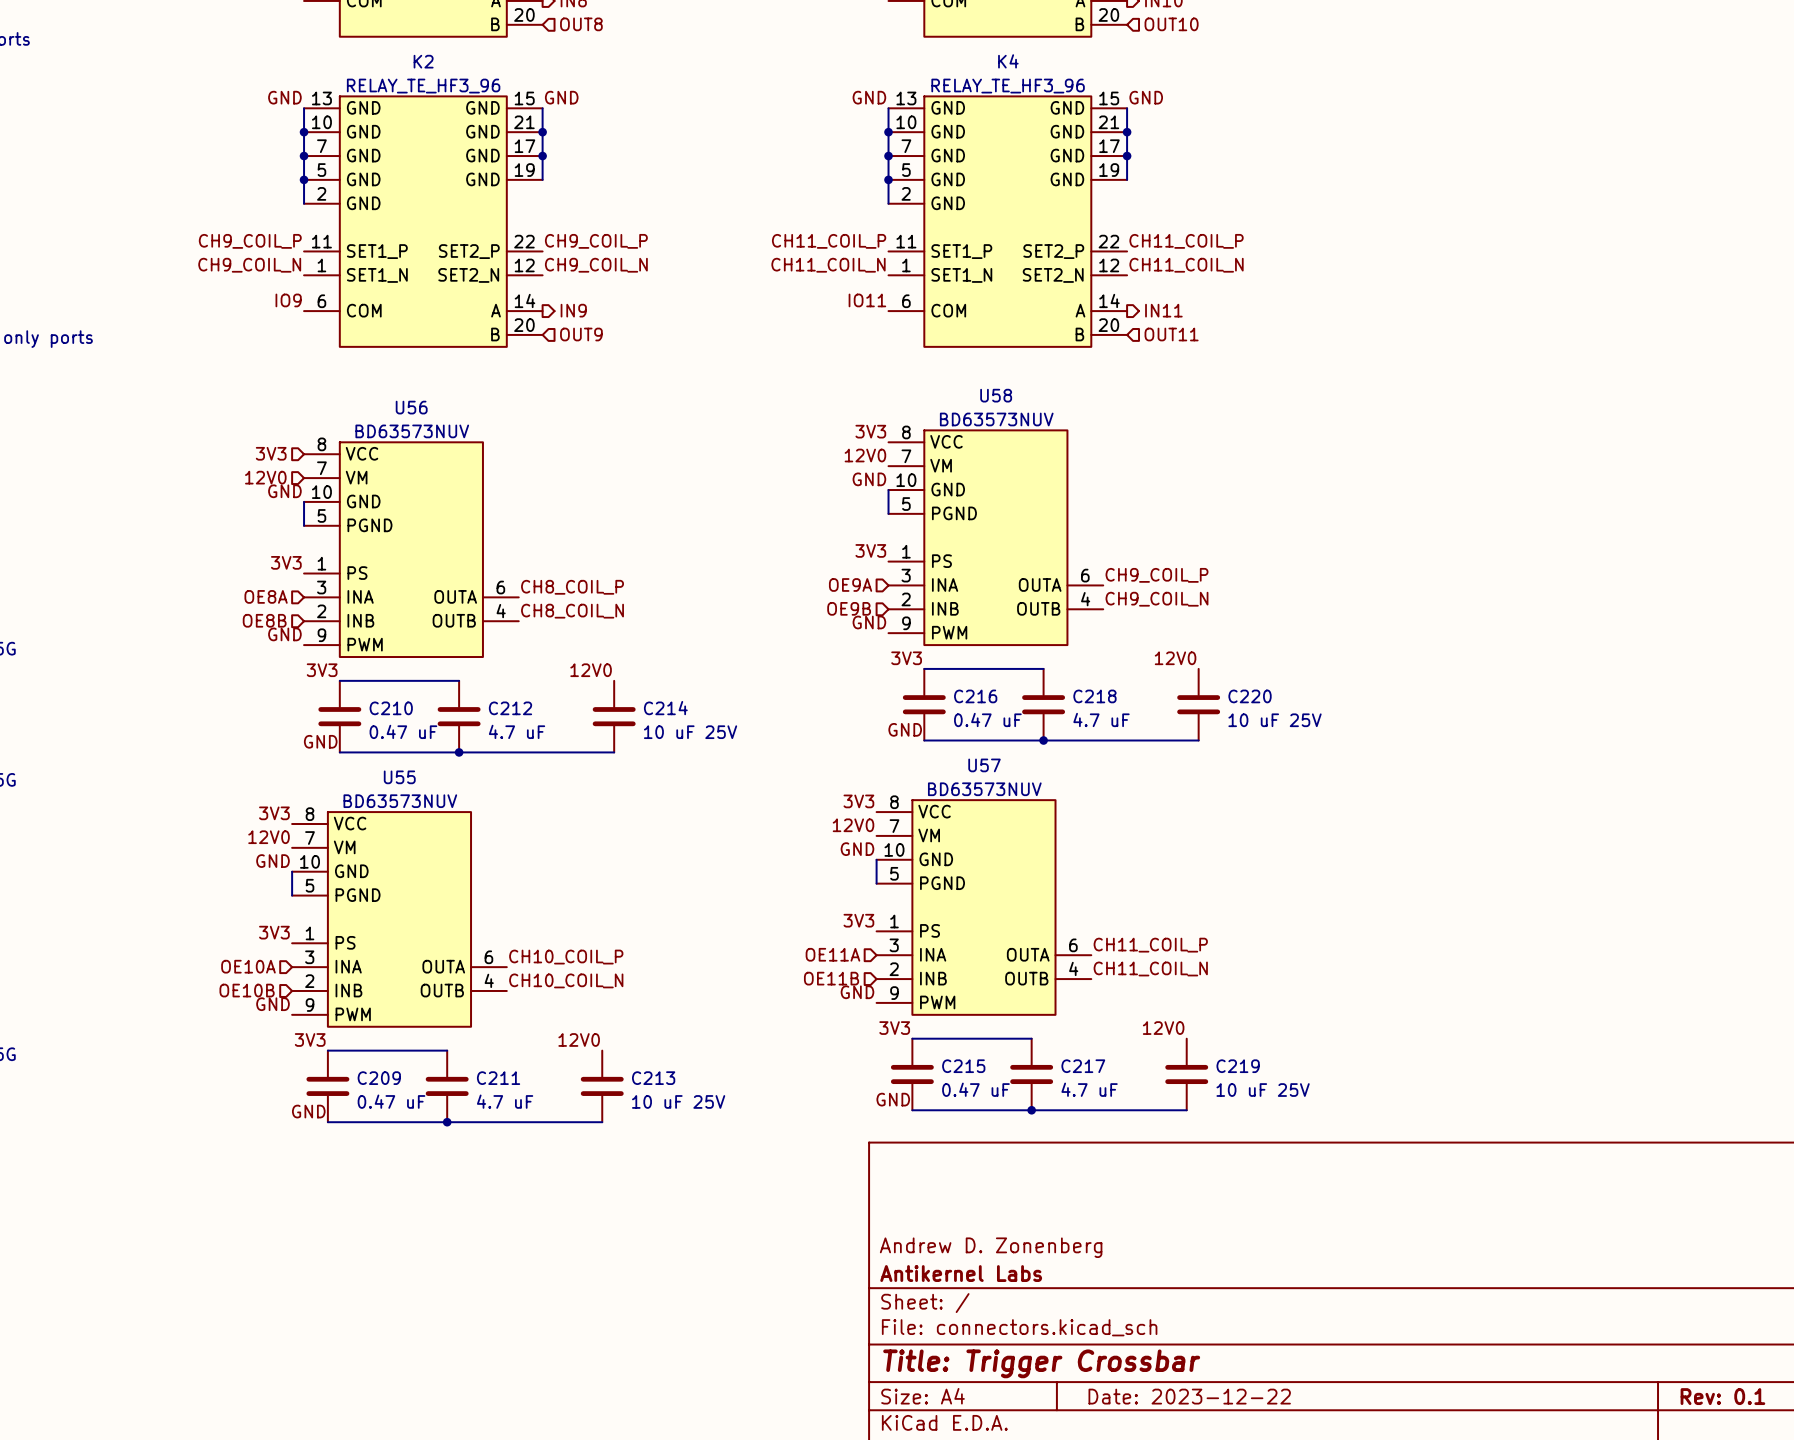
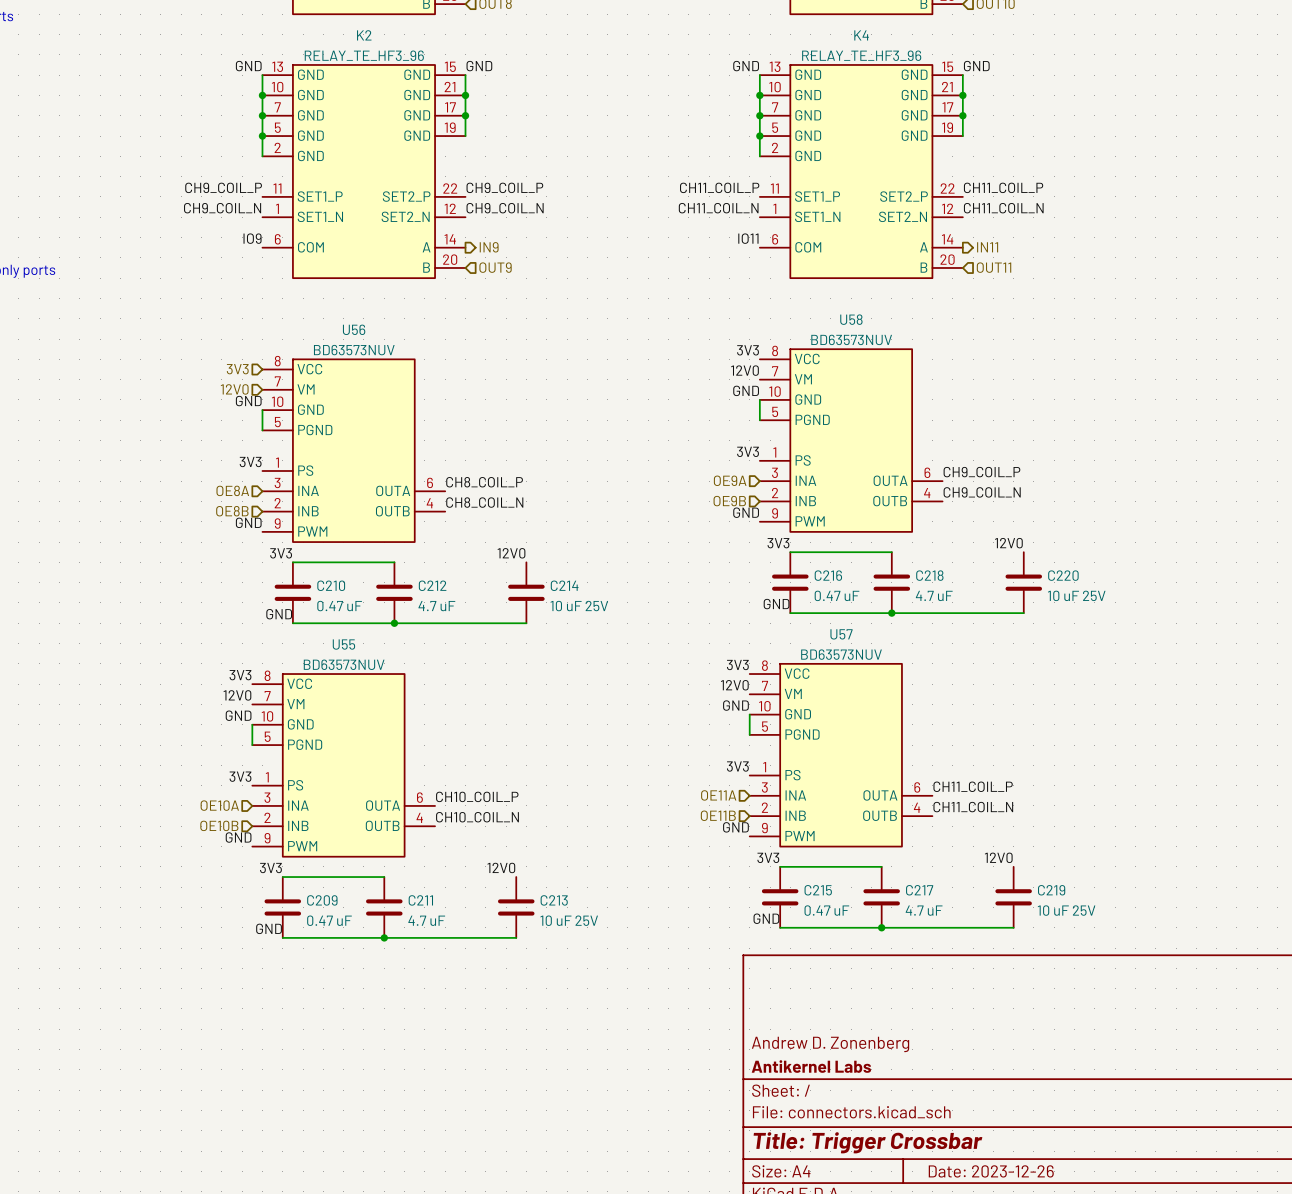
title block: Date: 2023-12-22 (1189, 1396) -> Date: 2023-12-26 (991, 1171)

